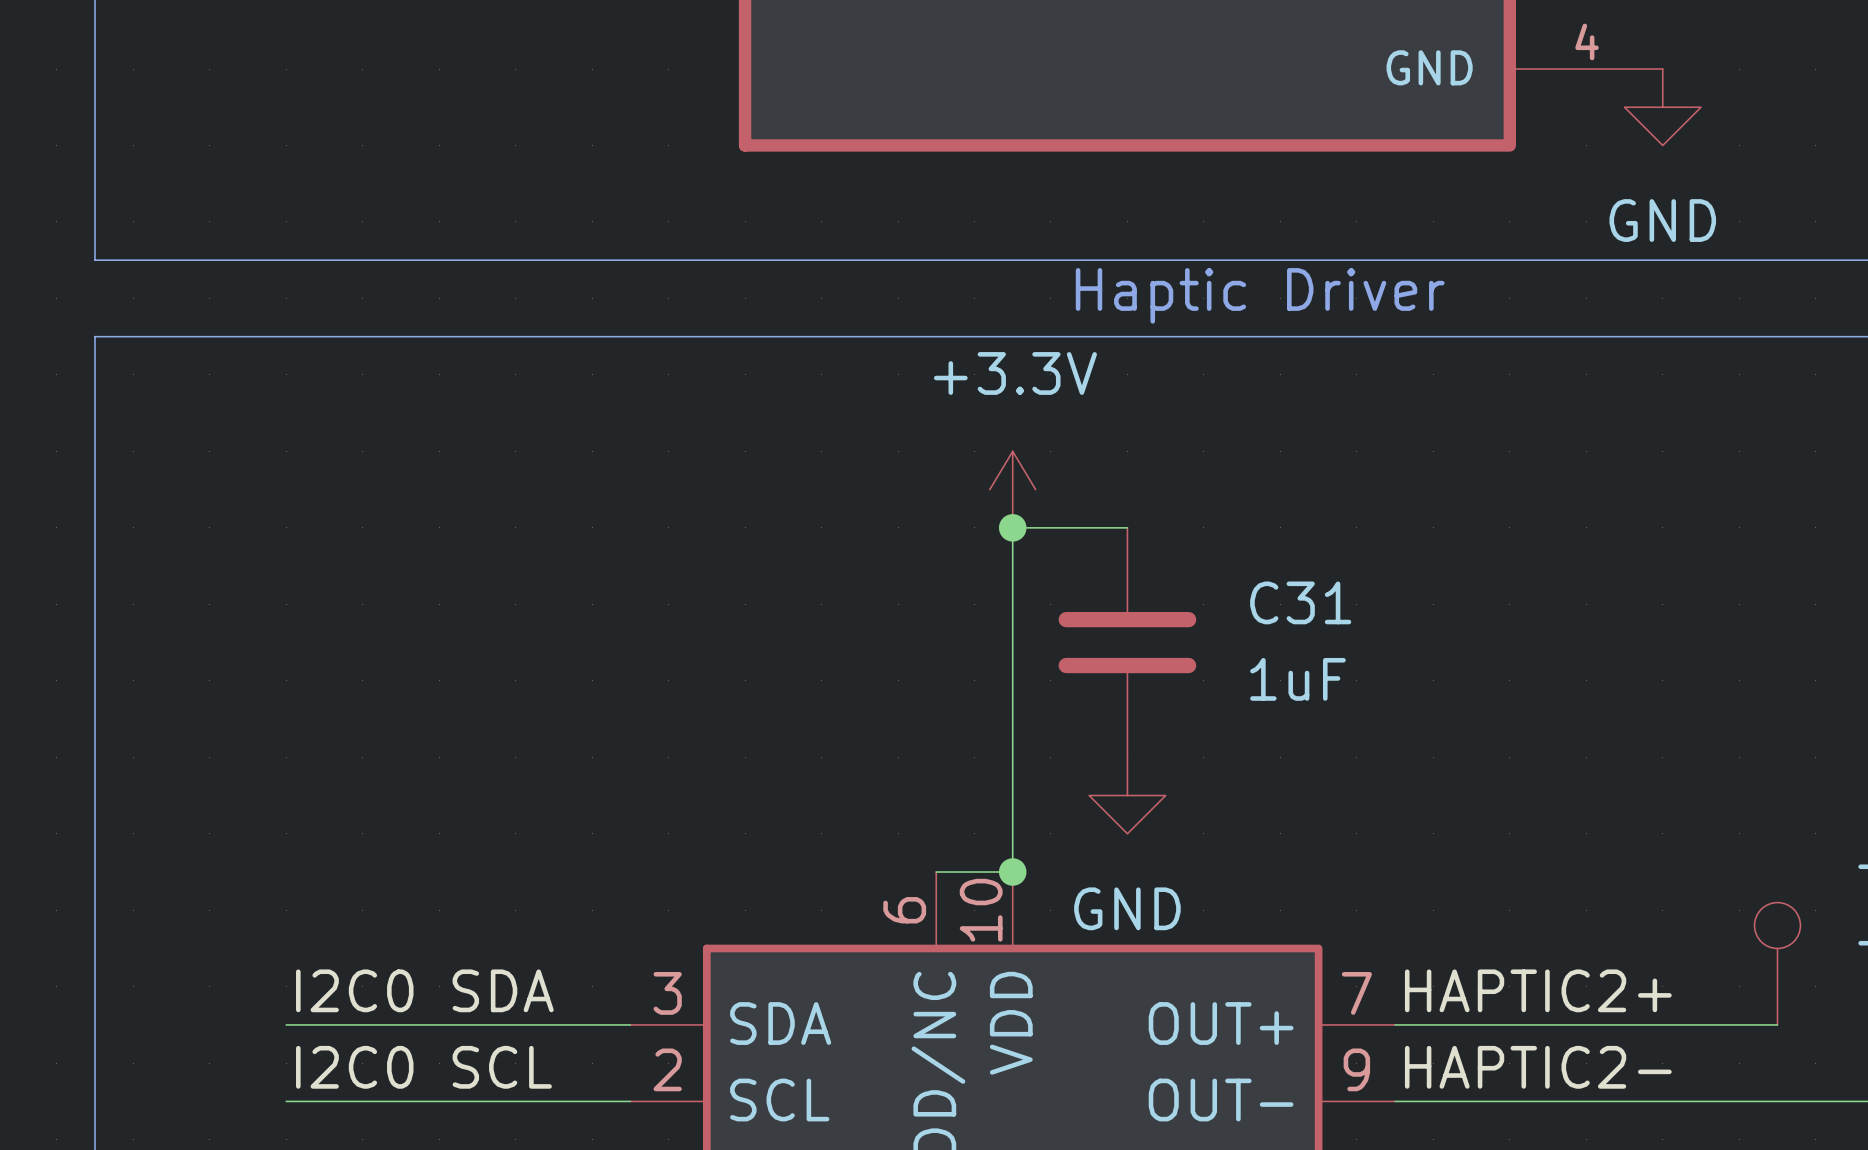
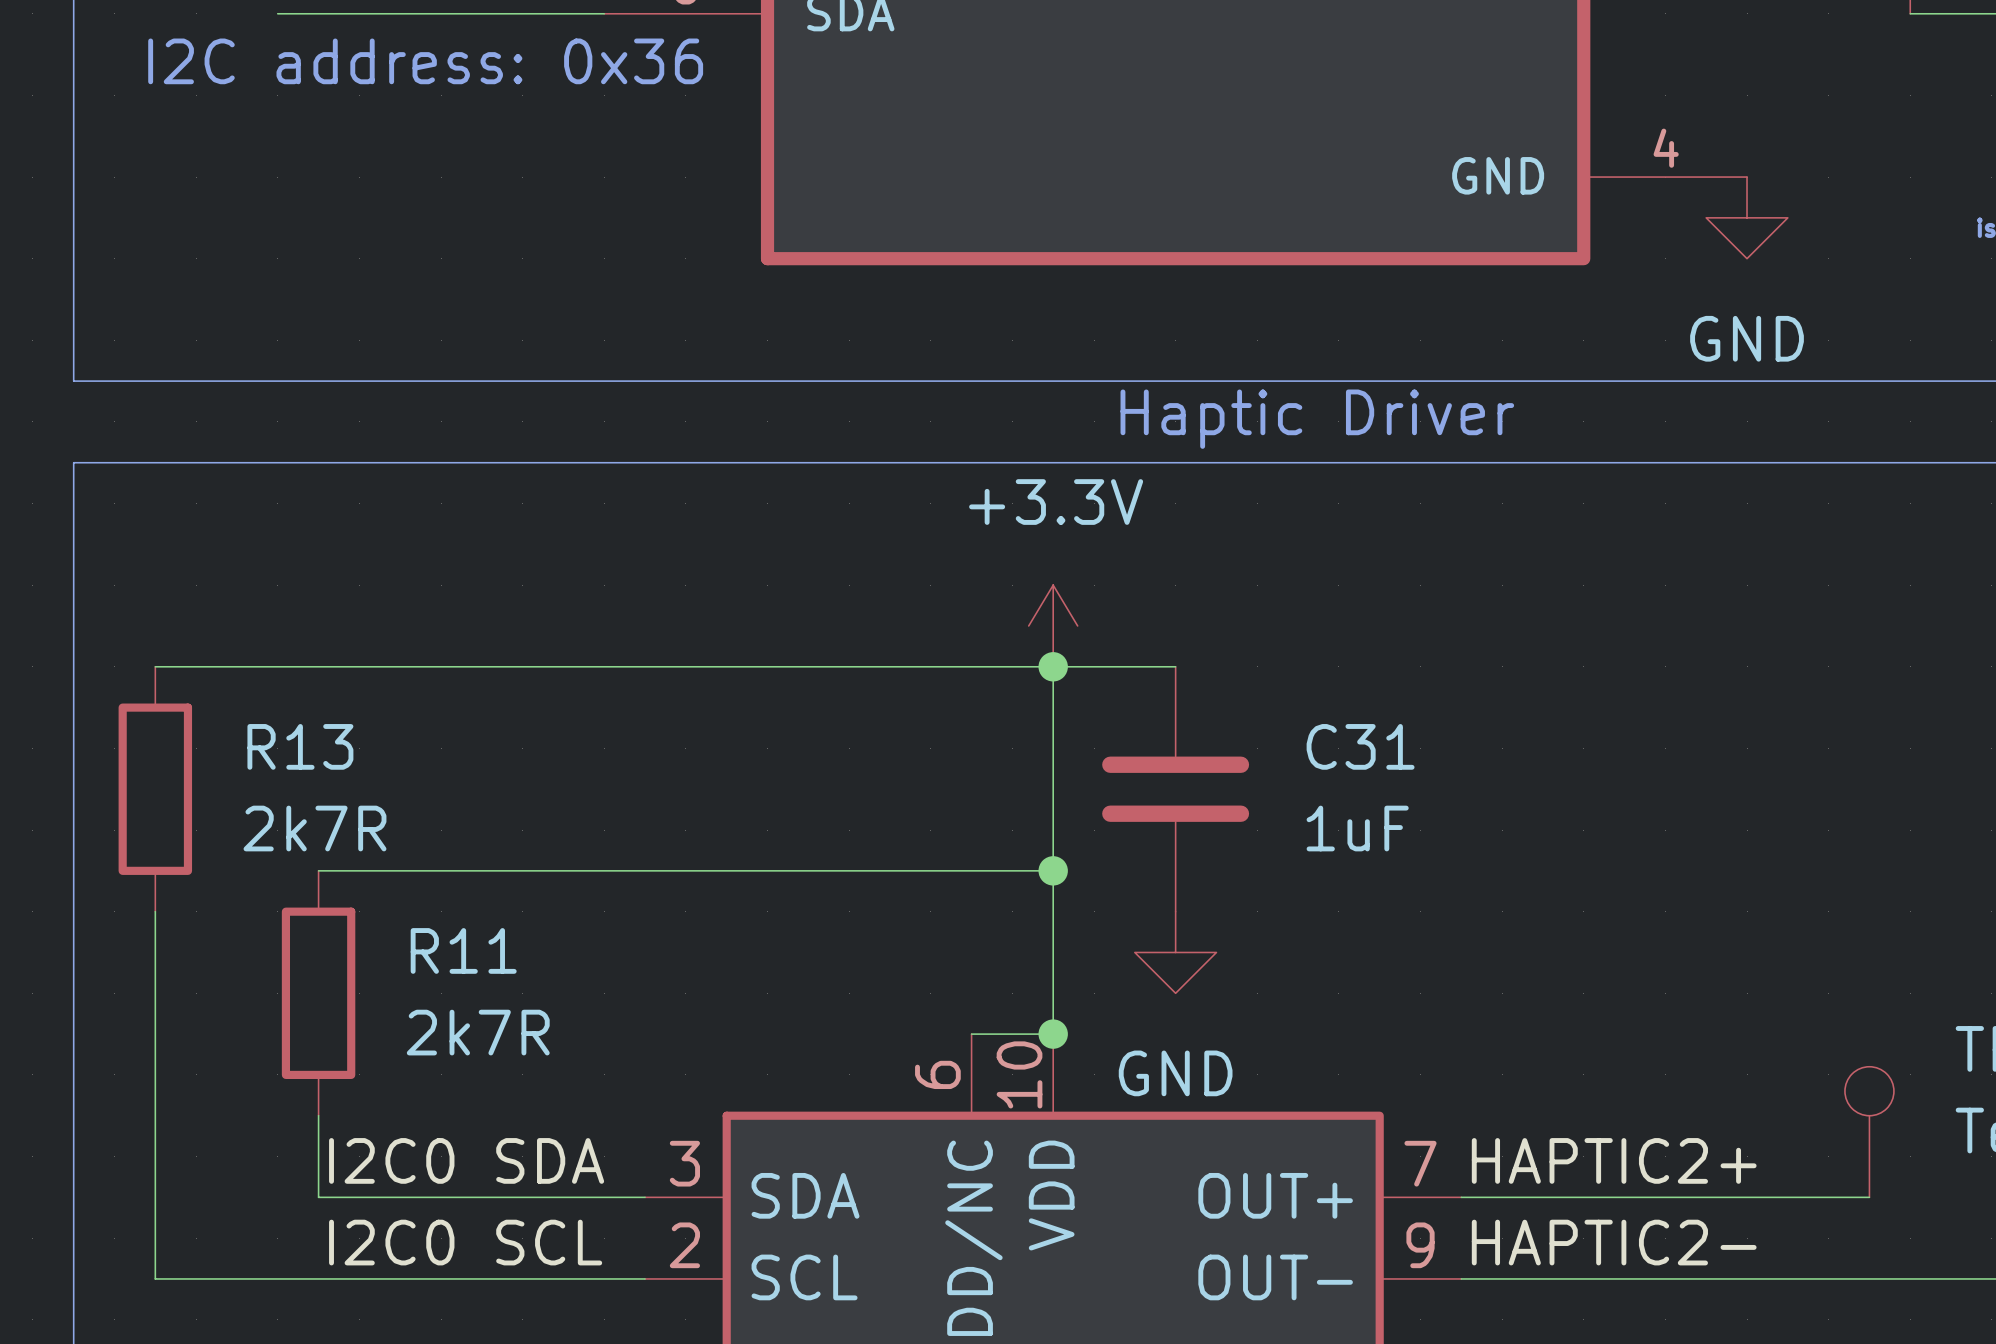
wire: none -> (155, 666) (1053, 666)
R13: none -> 2k7R (155, 789)
wire: none -> (318, 870) (1053, 870)
junction: none -> (1053, 870)
wire: none -> (155, 911) (155, 1278) (277, 1278)
R11: none -> 2k7R (318, 993)
label position: I2C0 SDA (424, 990) -> I2C0 SDA (466, 1160)
wire: (286, 1024) (324, 1024) -> (318, 1115) (318, 1197)
label position: I2C0 SCL (423, 1067) -> I2C0 SCL (465, 1242)

